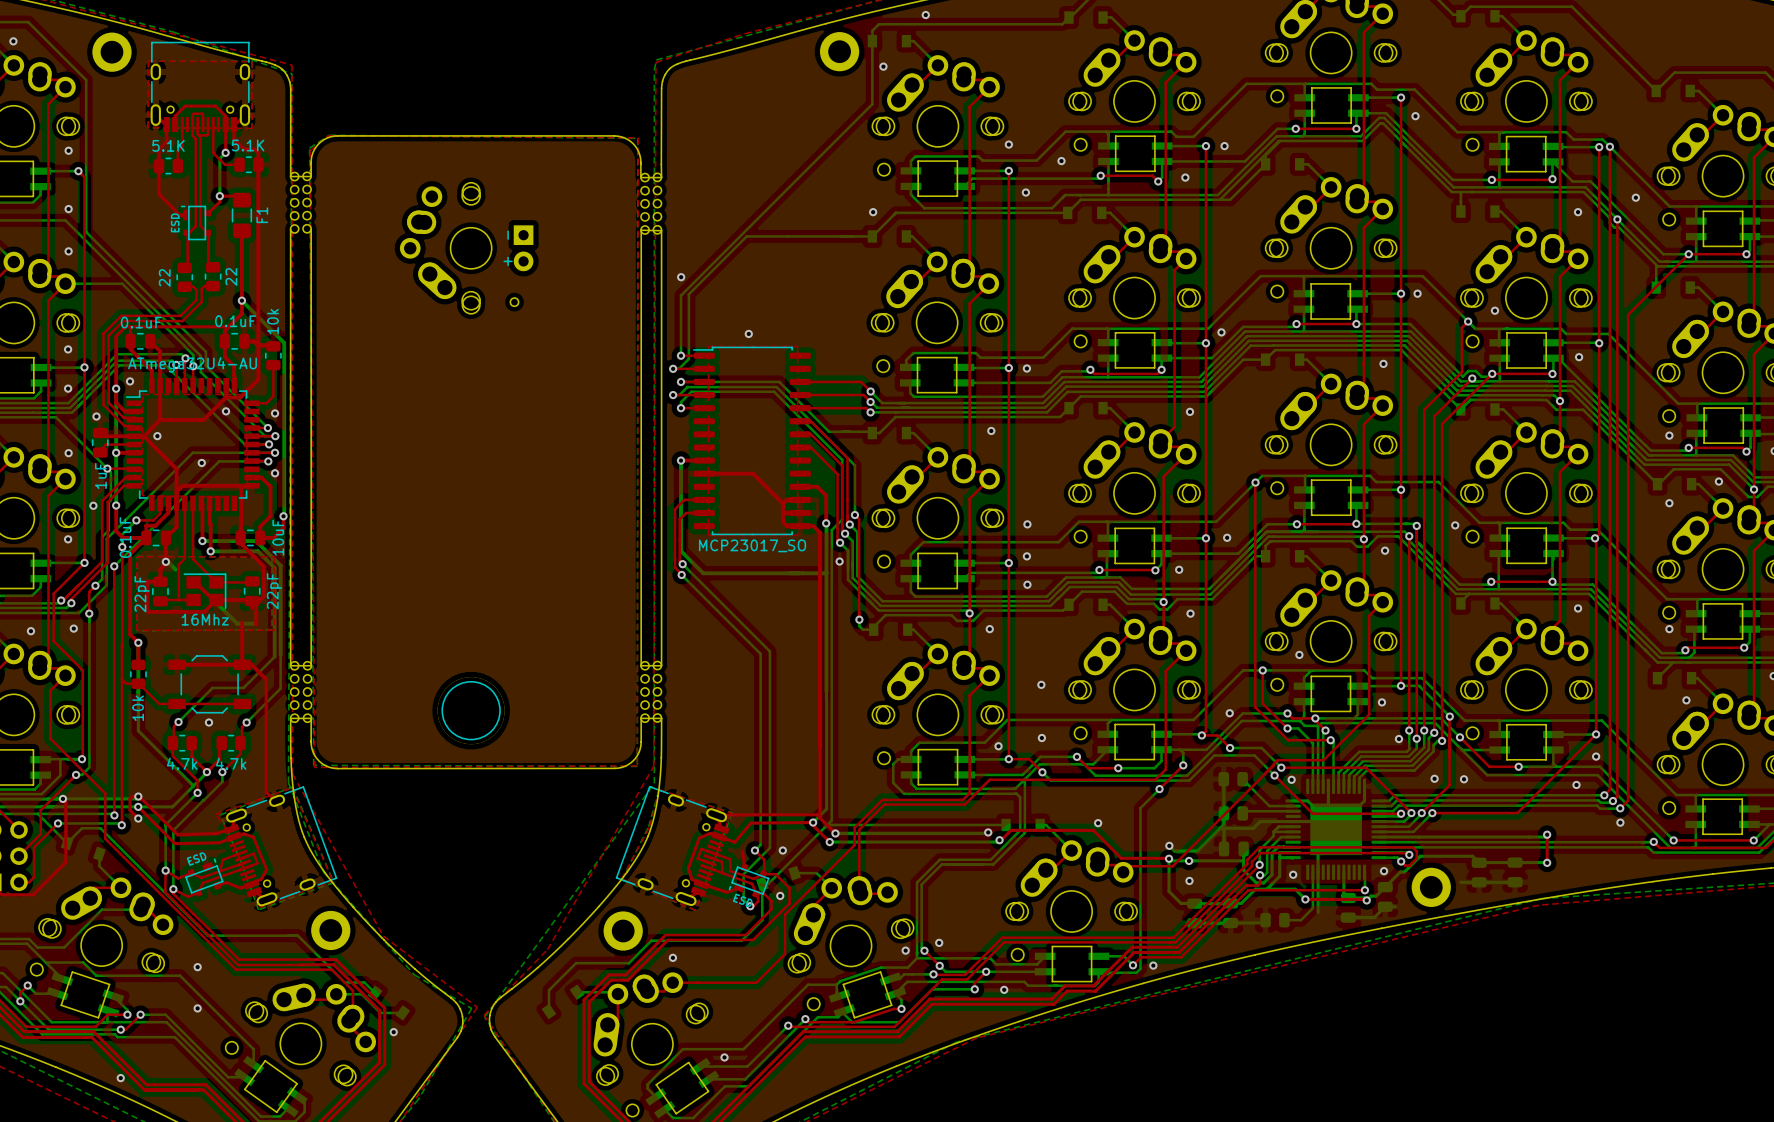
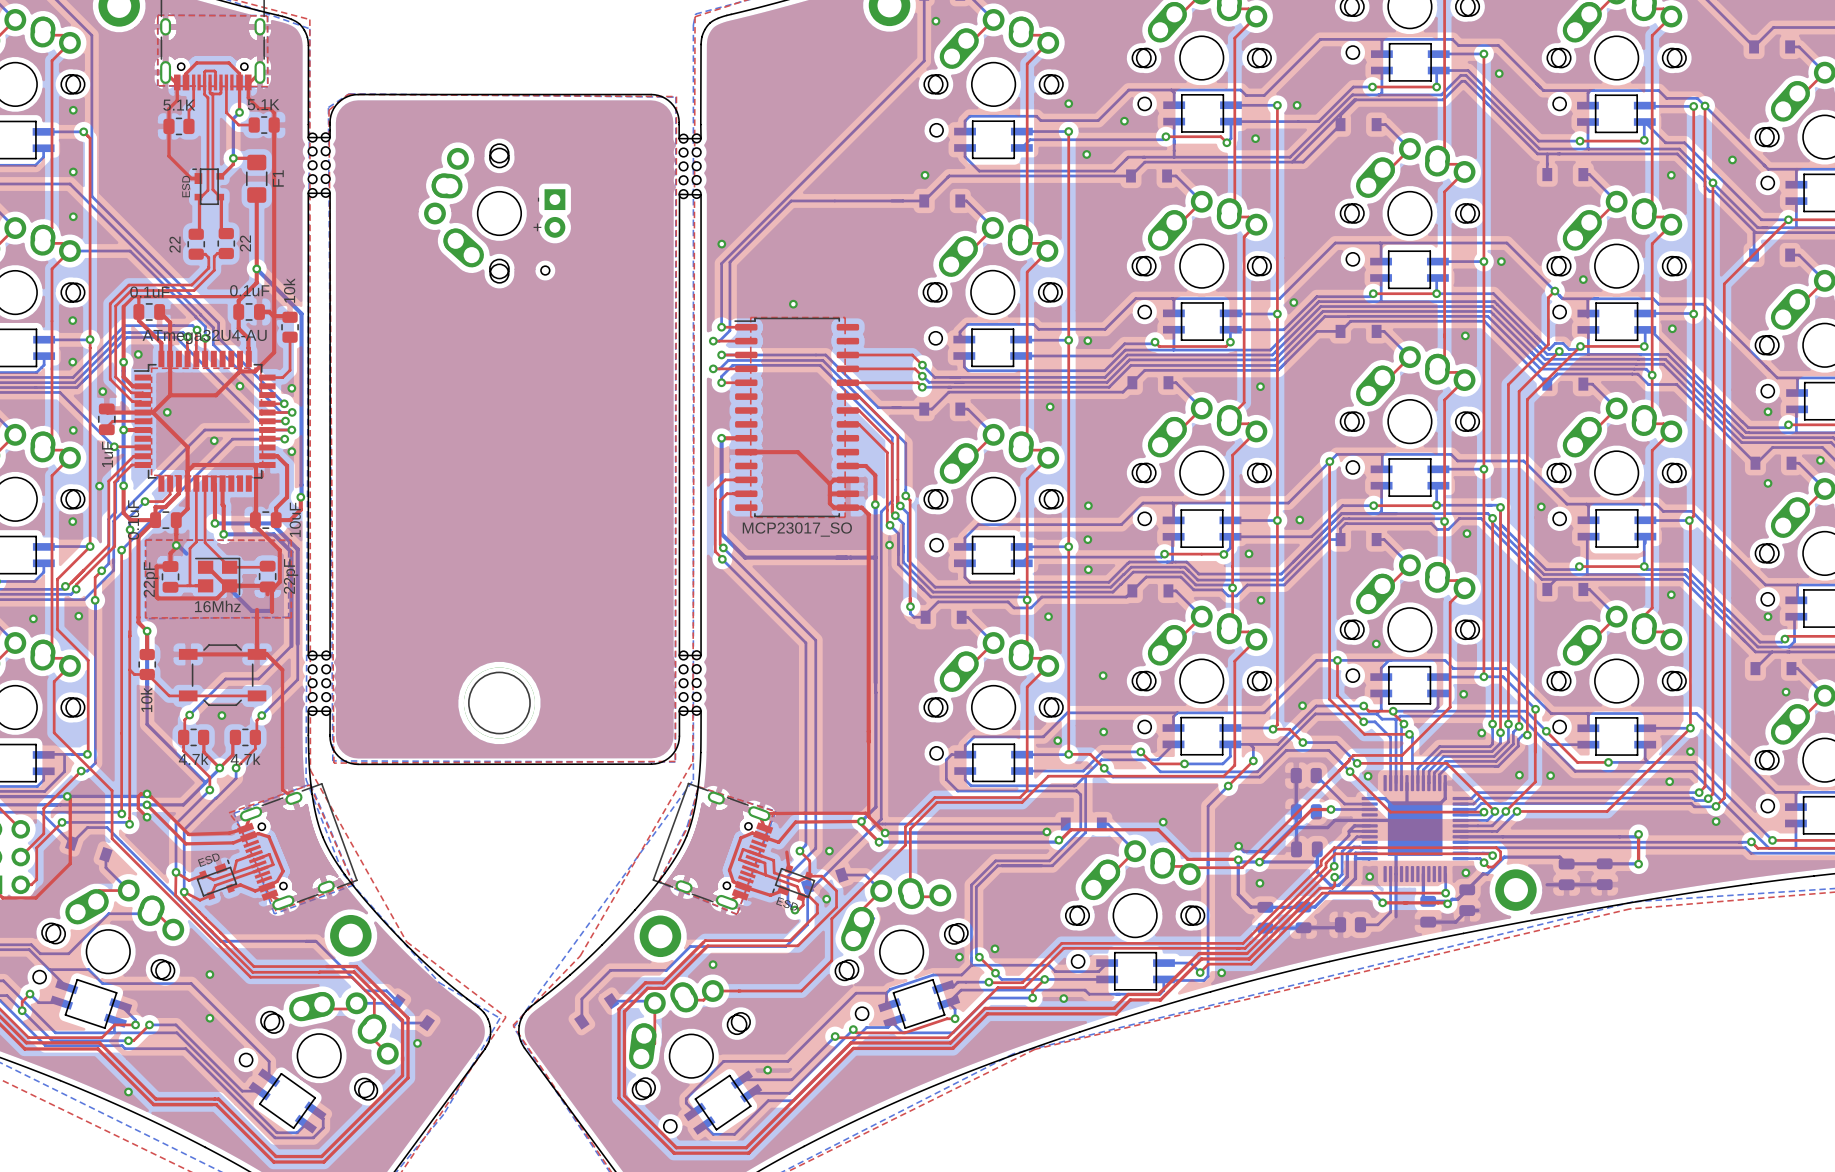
board edge: none -> (308, 193) (330, 193)
top track: none -> (1330, 809) (1312, 809) (1259, 862)
via: none -> (1331, 809)

